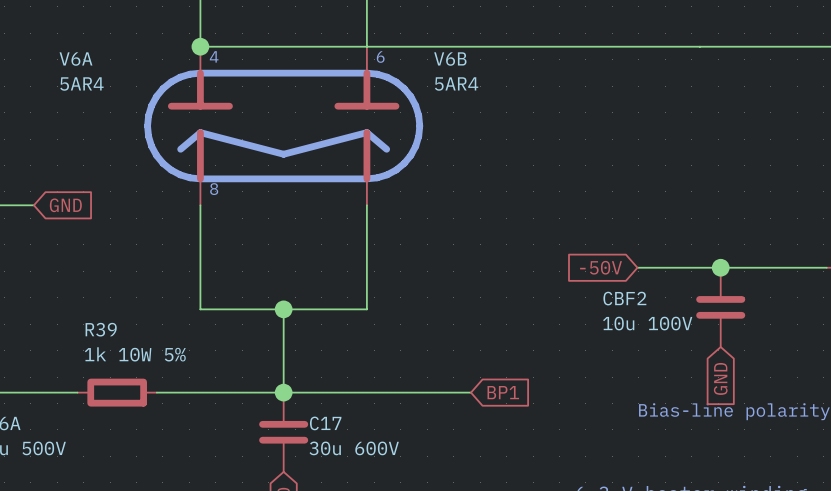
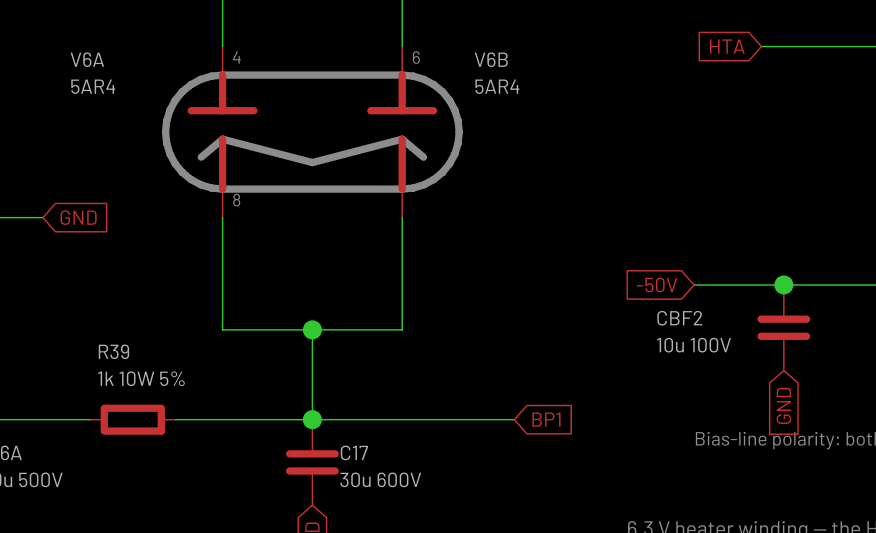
wire: (200, 46) (699, 46) -> none
junction: (200, 46) -> none
global label: none -> HTA (727, 46)

